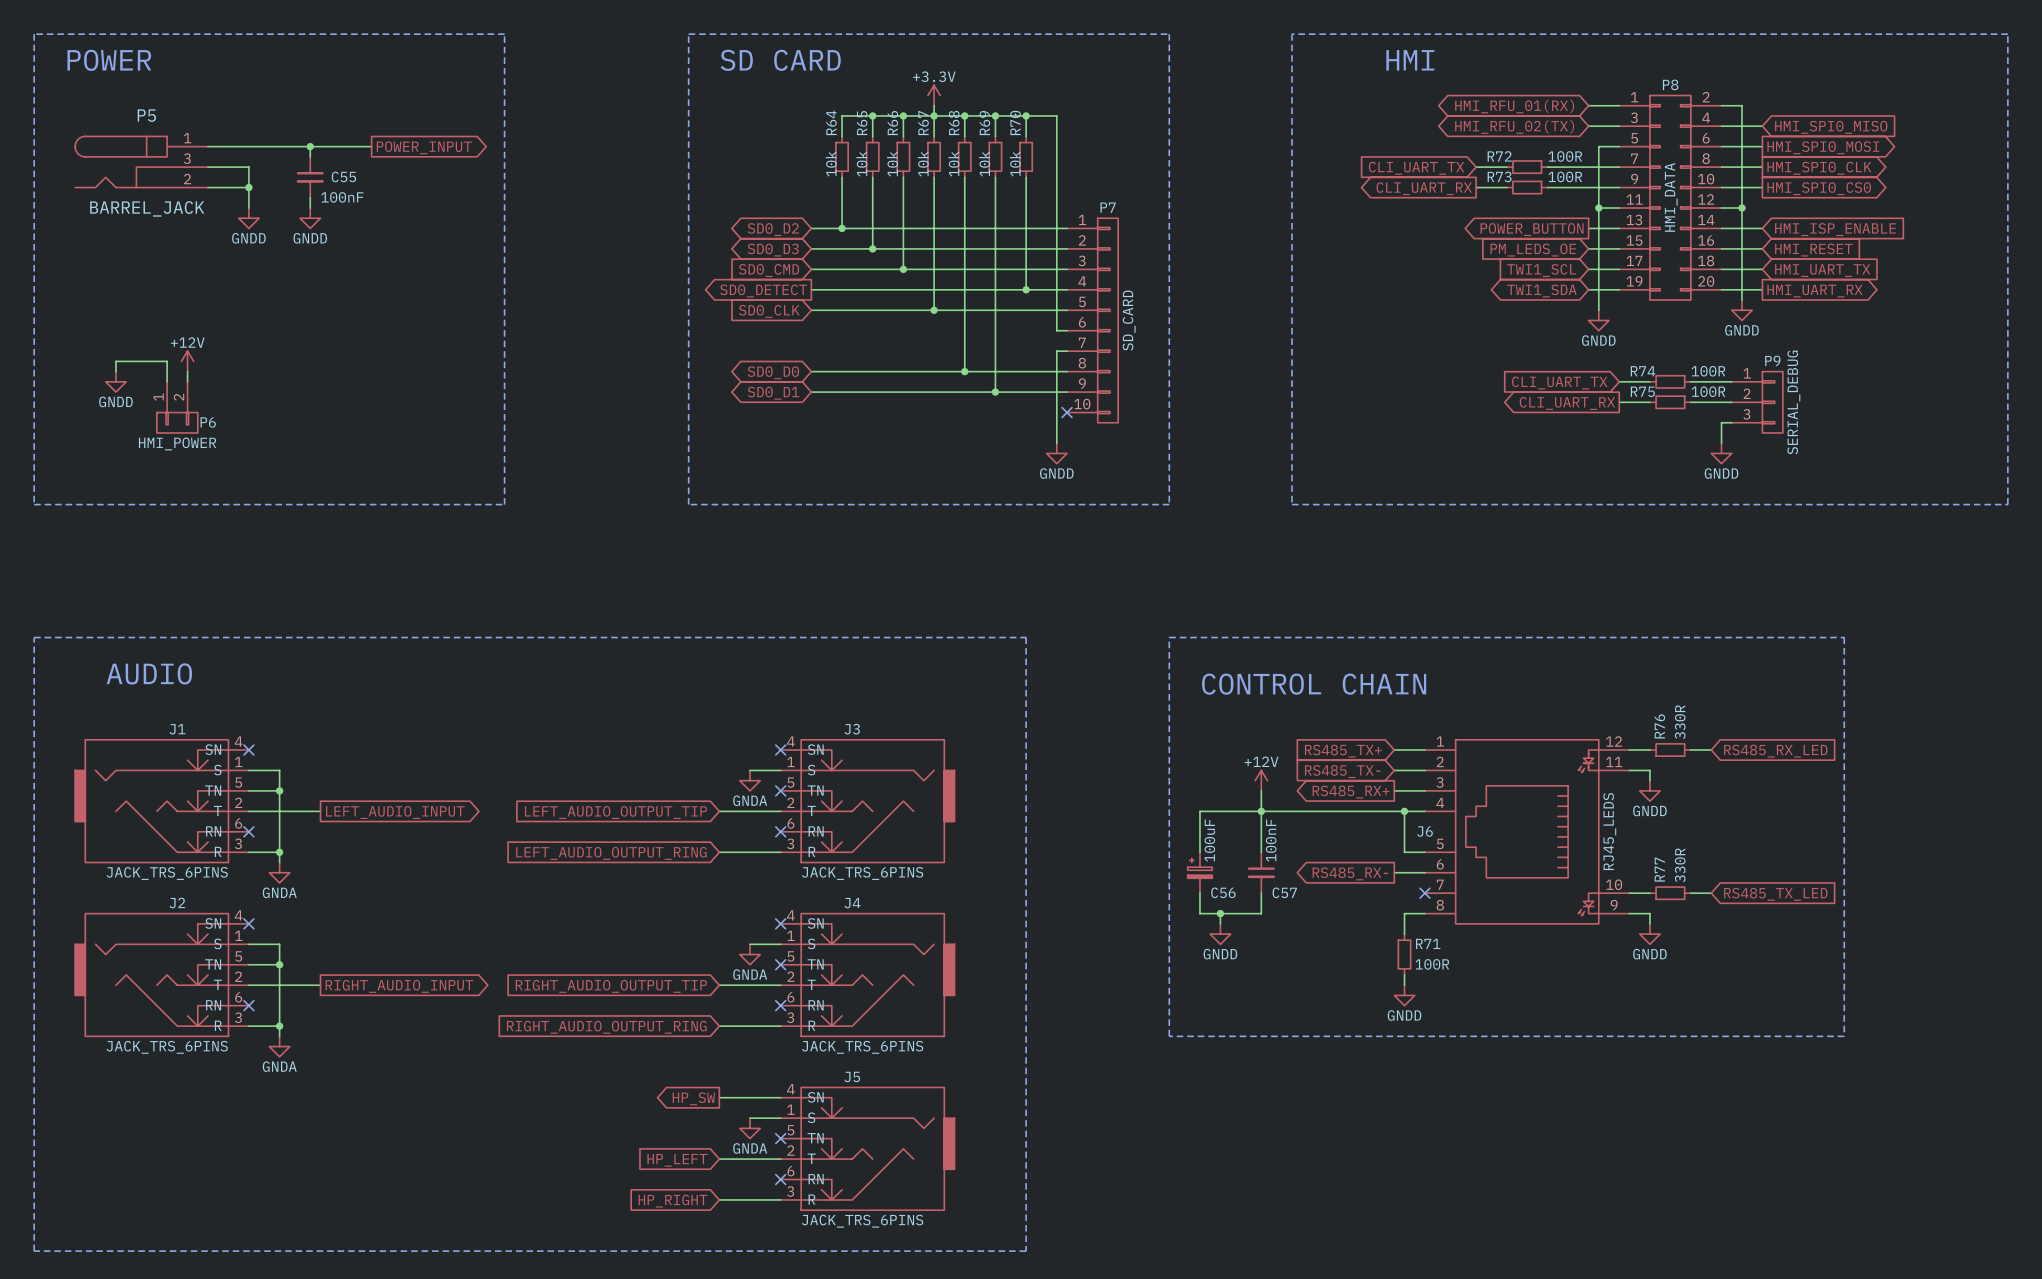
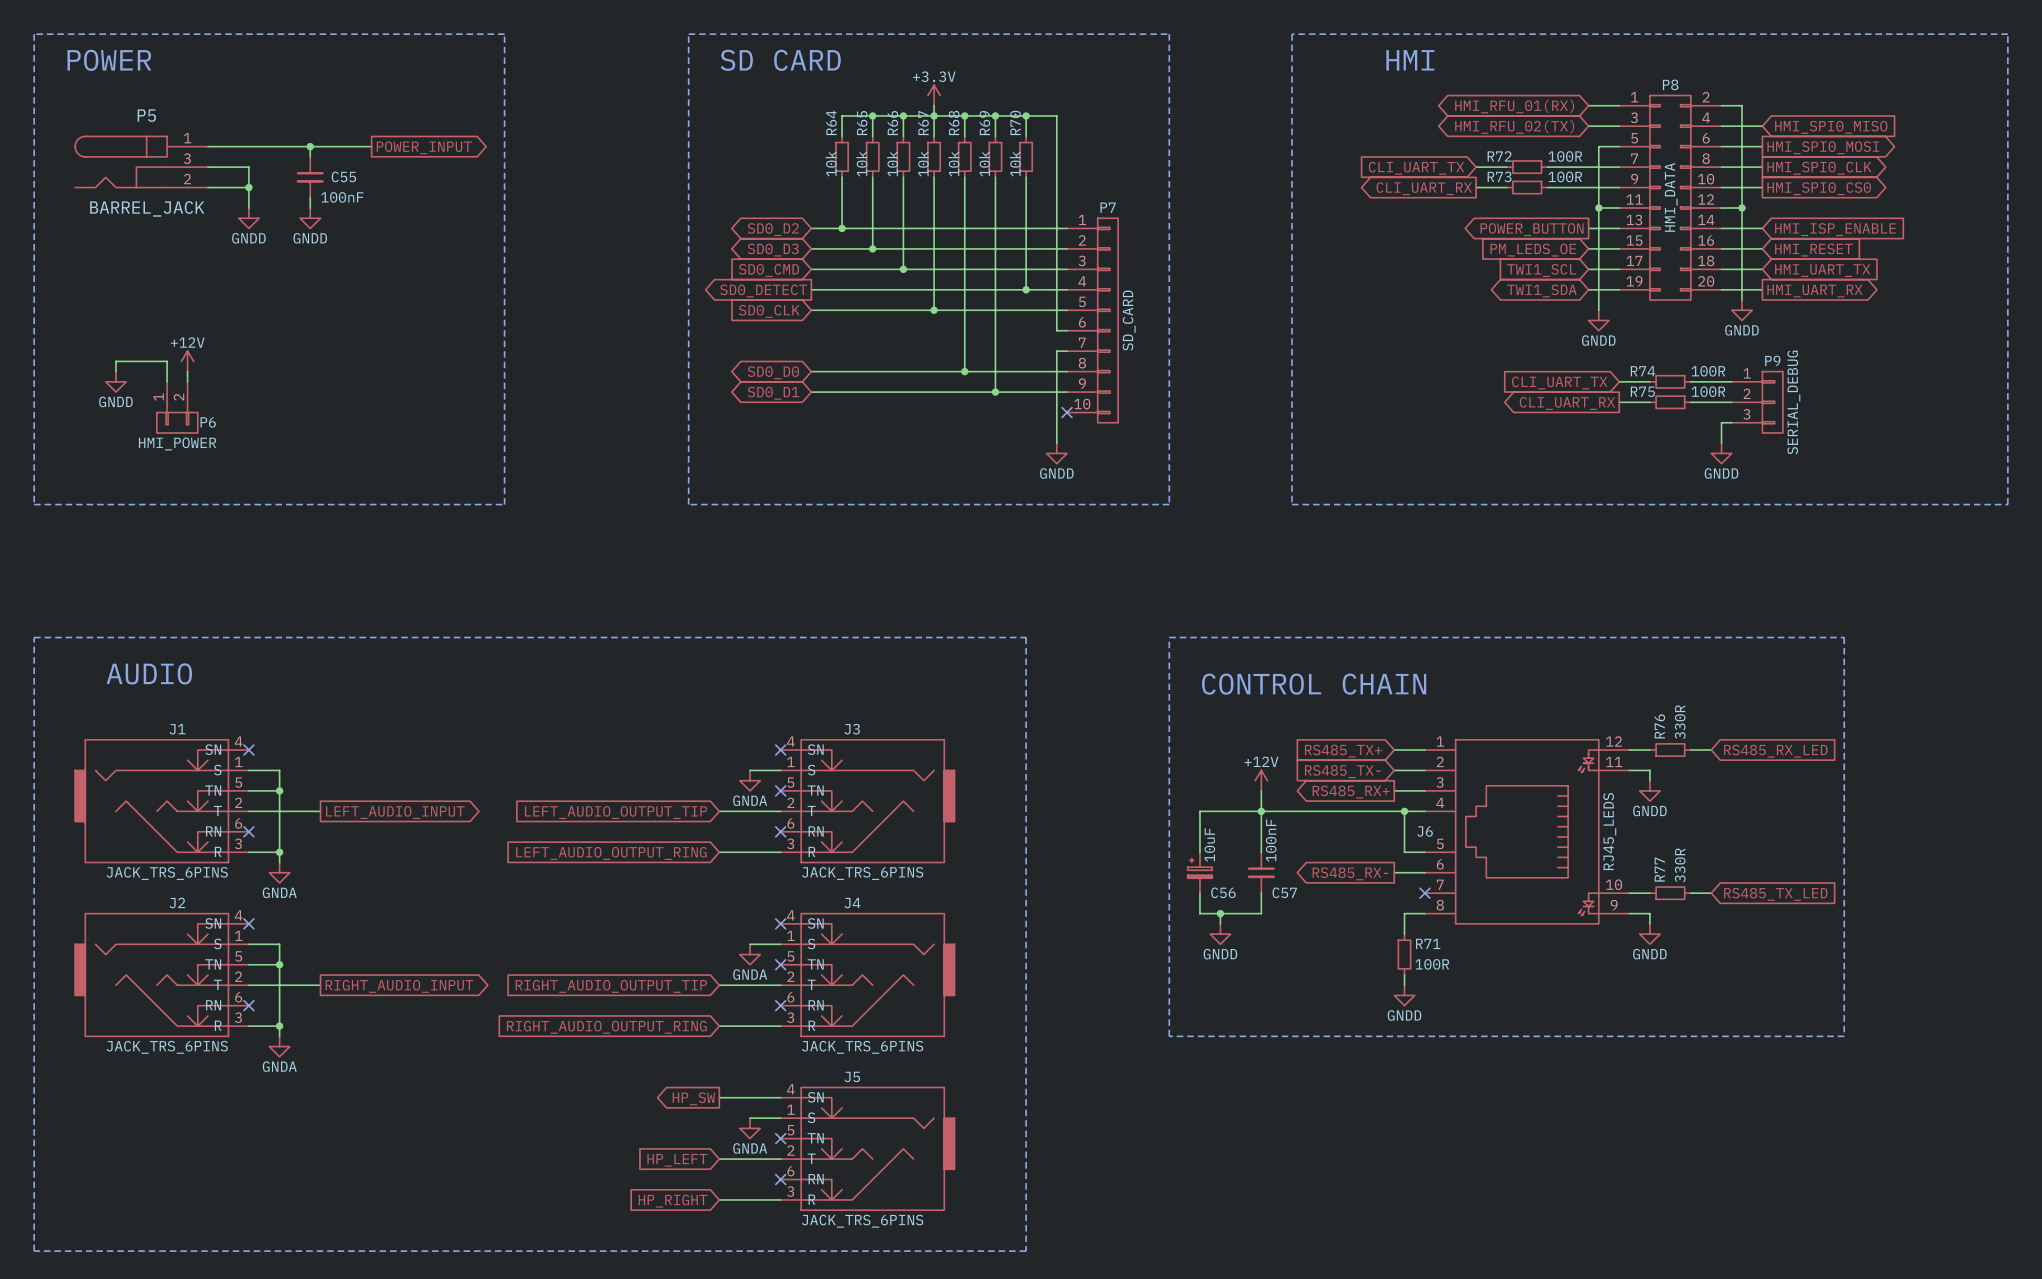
C56 value: 100uF (1209, 840) -> 10uF (1209, 845)

